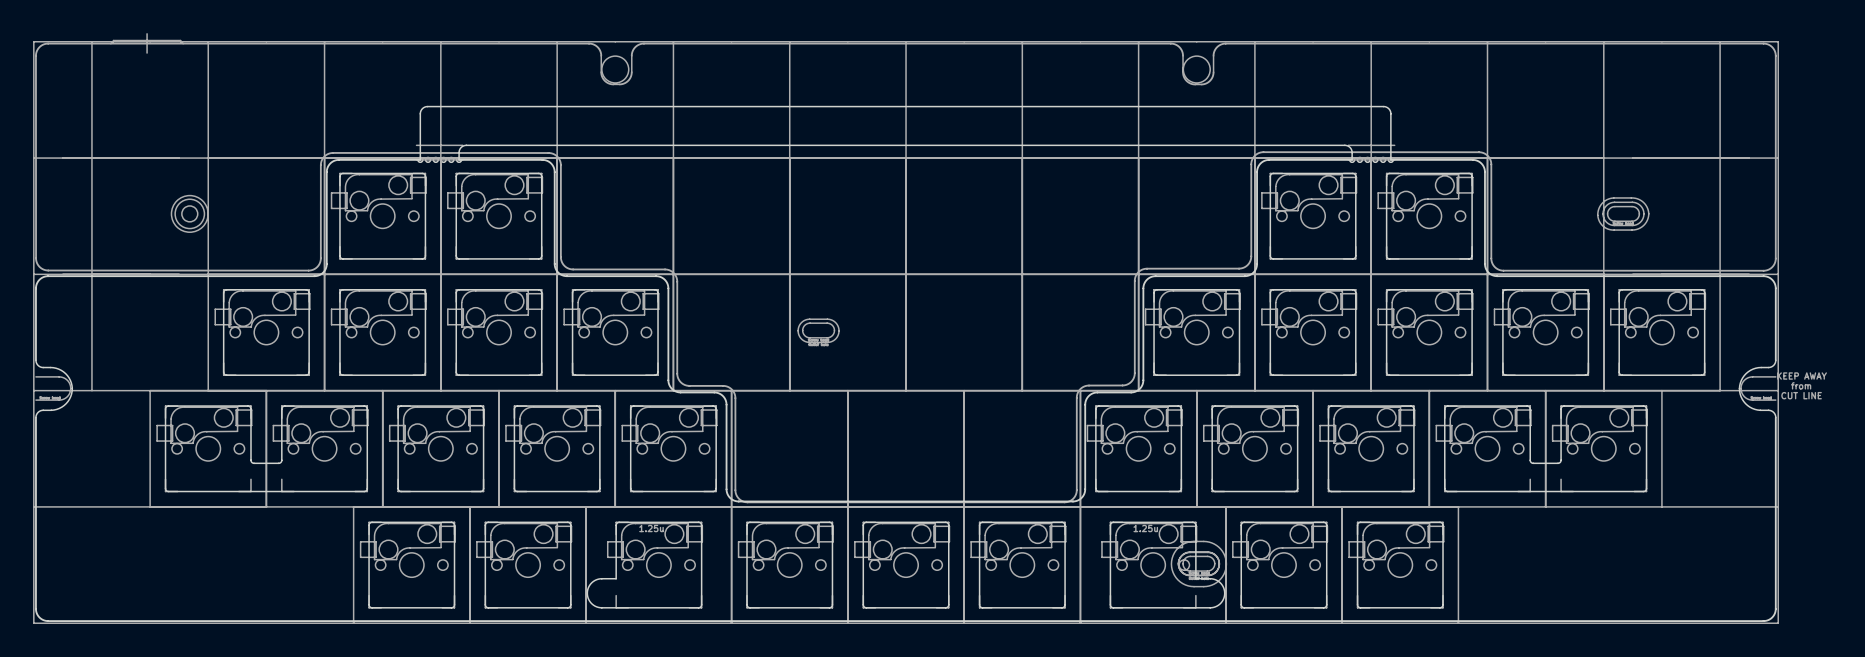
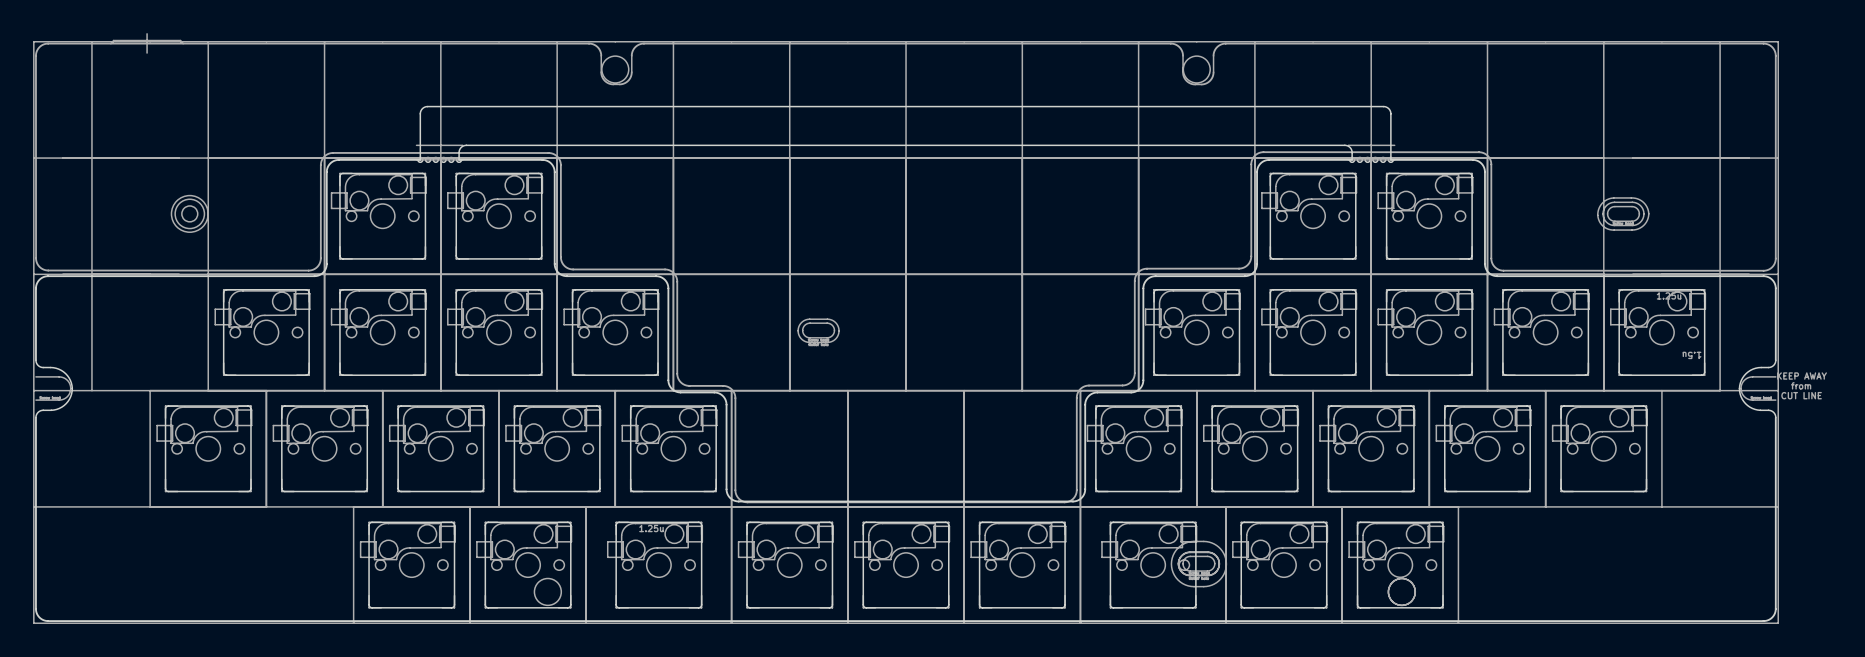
part footprint: [33, 33, 1779, 624] -> [33, 33, 1779, 624]

